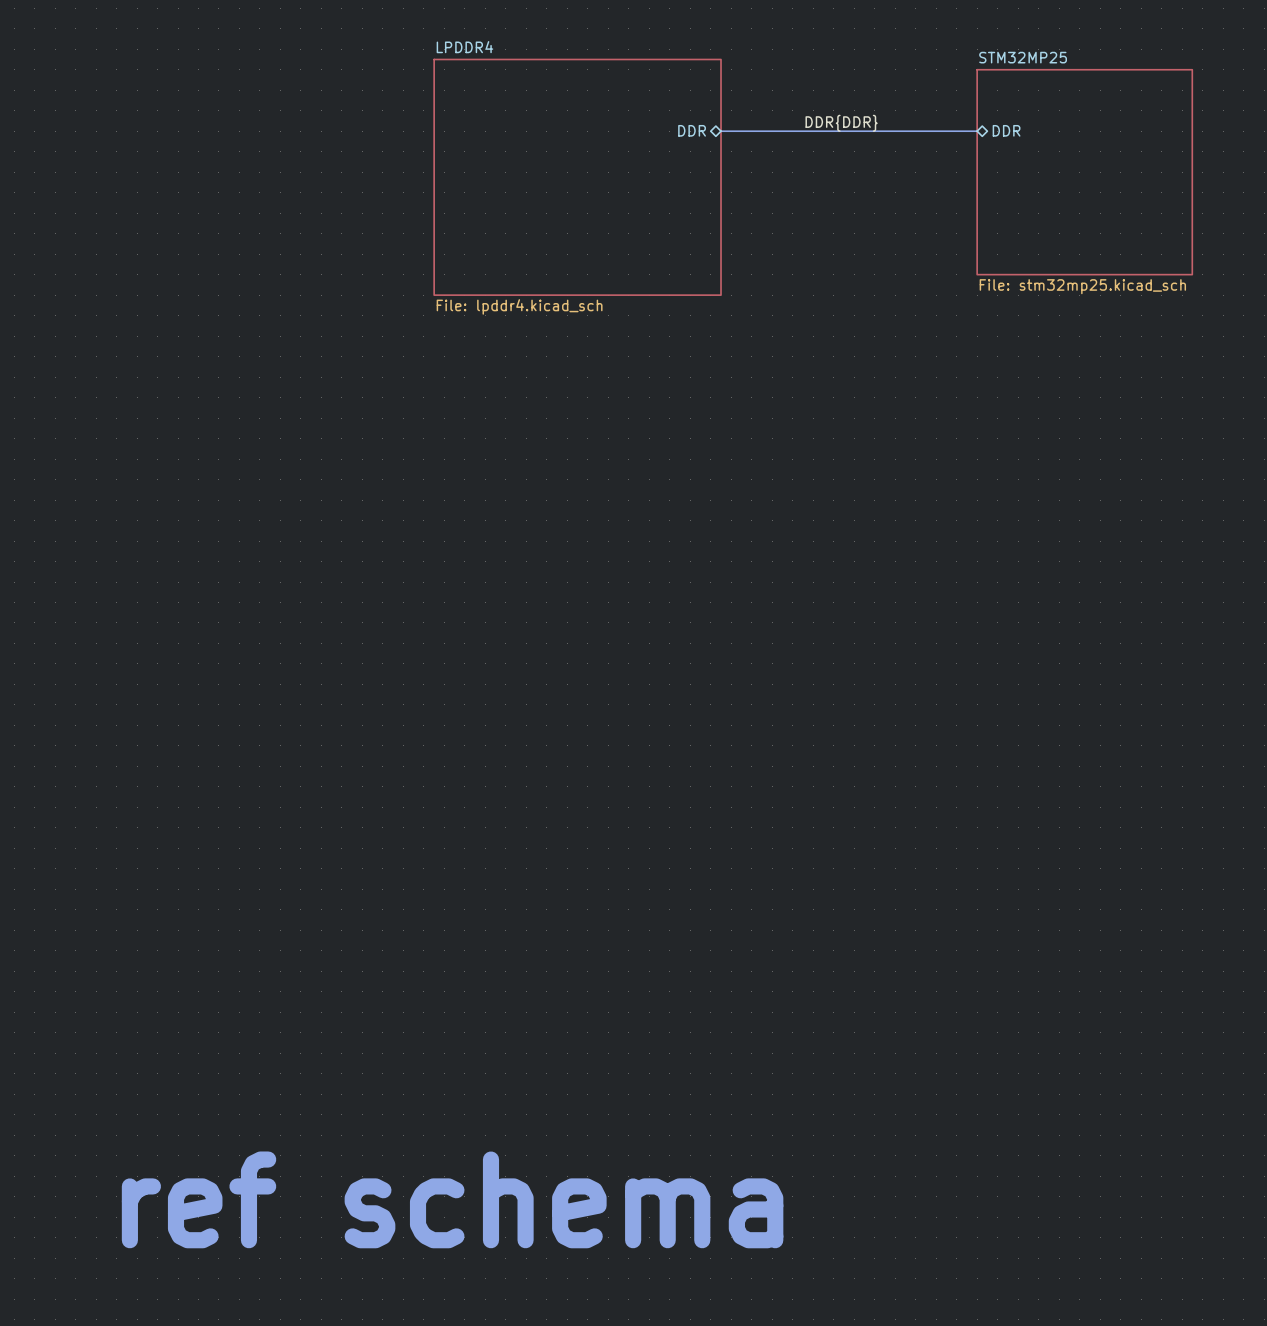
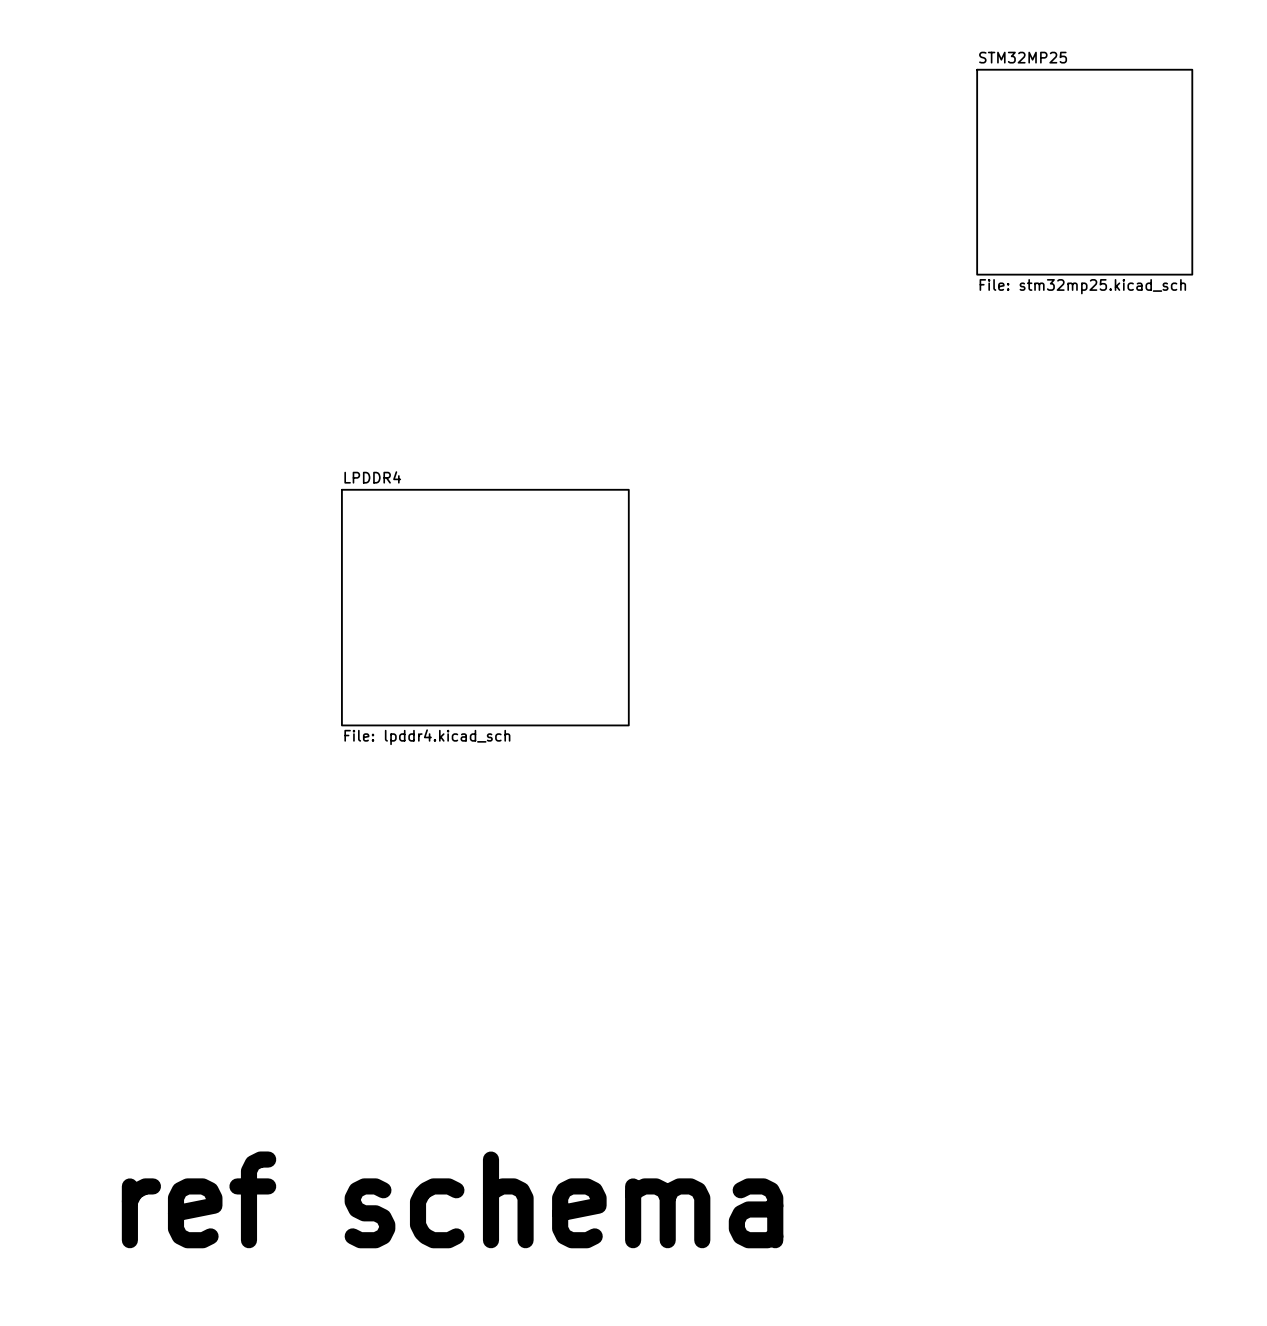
label: DDR{DDR} (841, 123) -> none
sheet pin: DDR (692, 130) -> none
sheet pin: DDR (1006, 130) -> none
bus: (721, 131) (977, 131) -> none
sheet LPDDR4 position: (577, 177) -> (485, 607)

